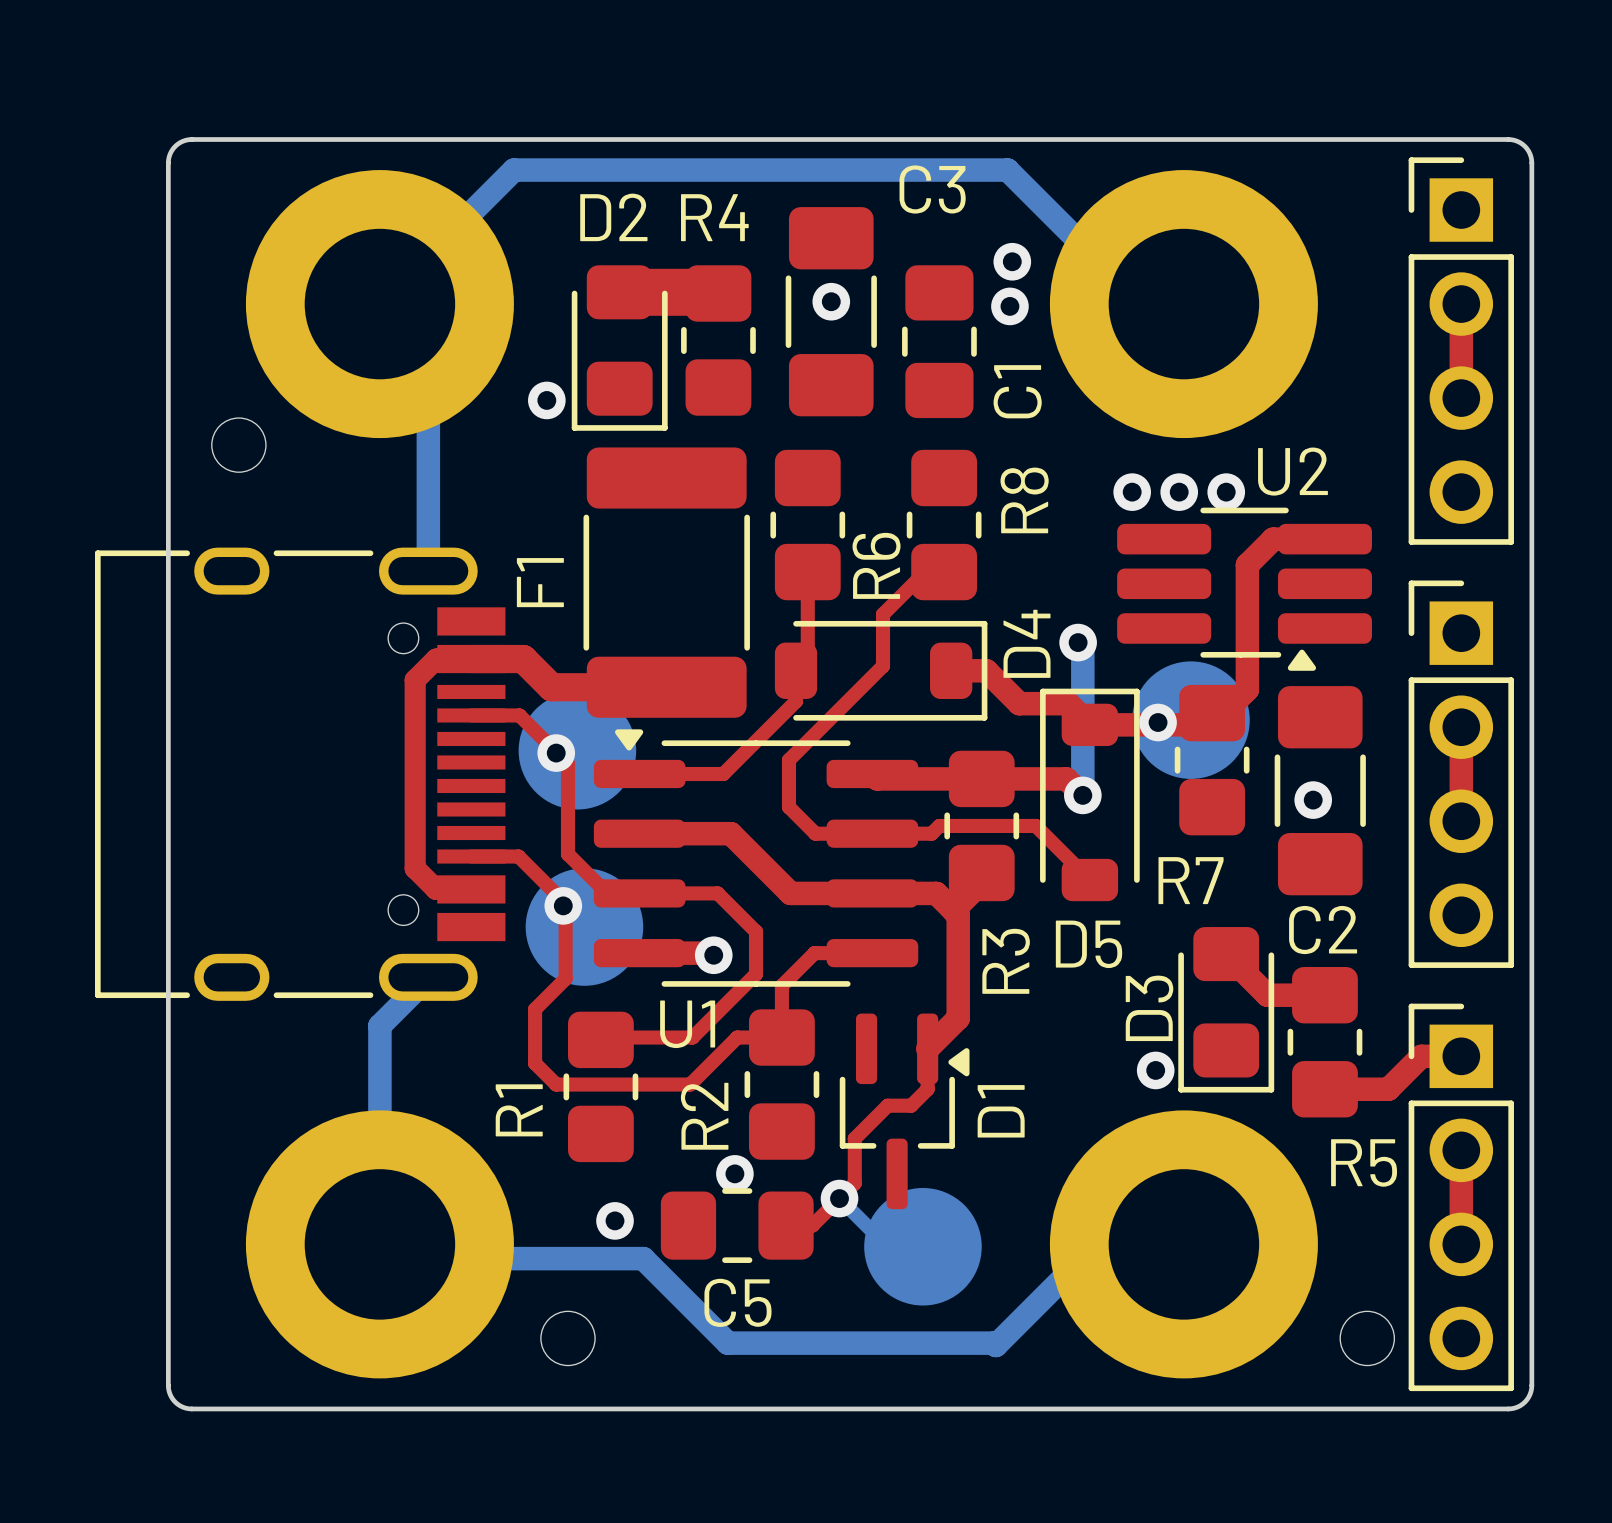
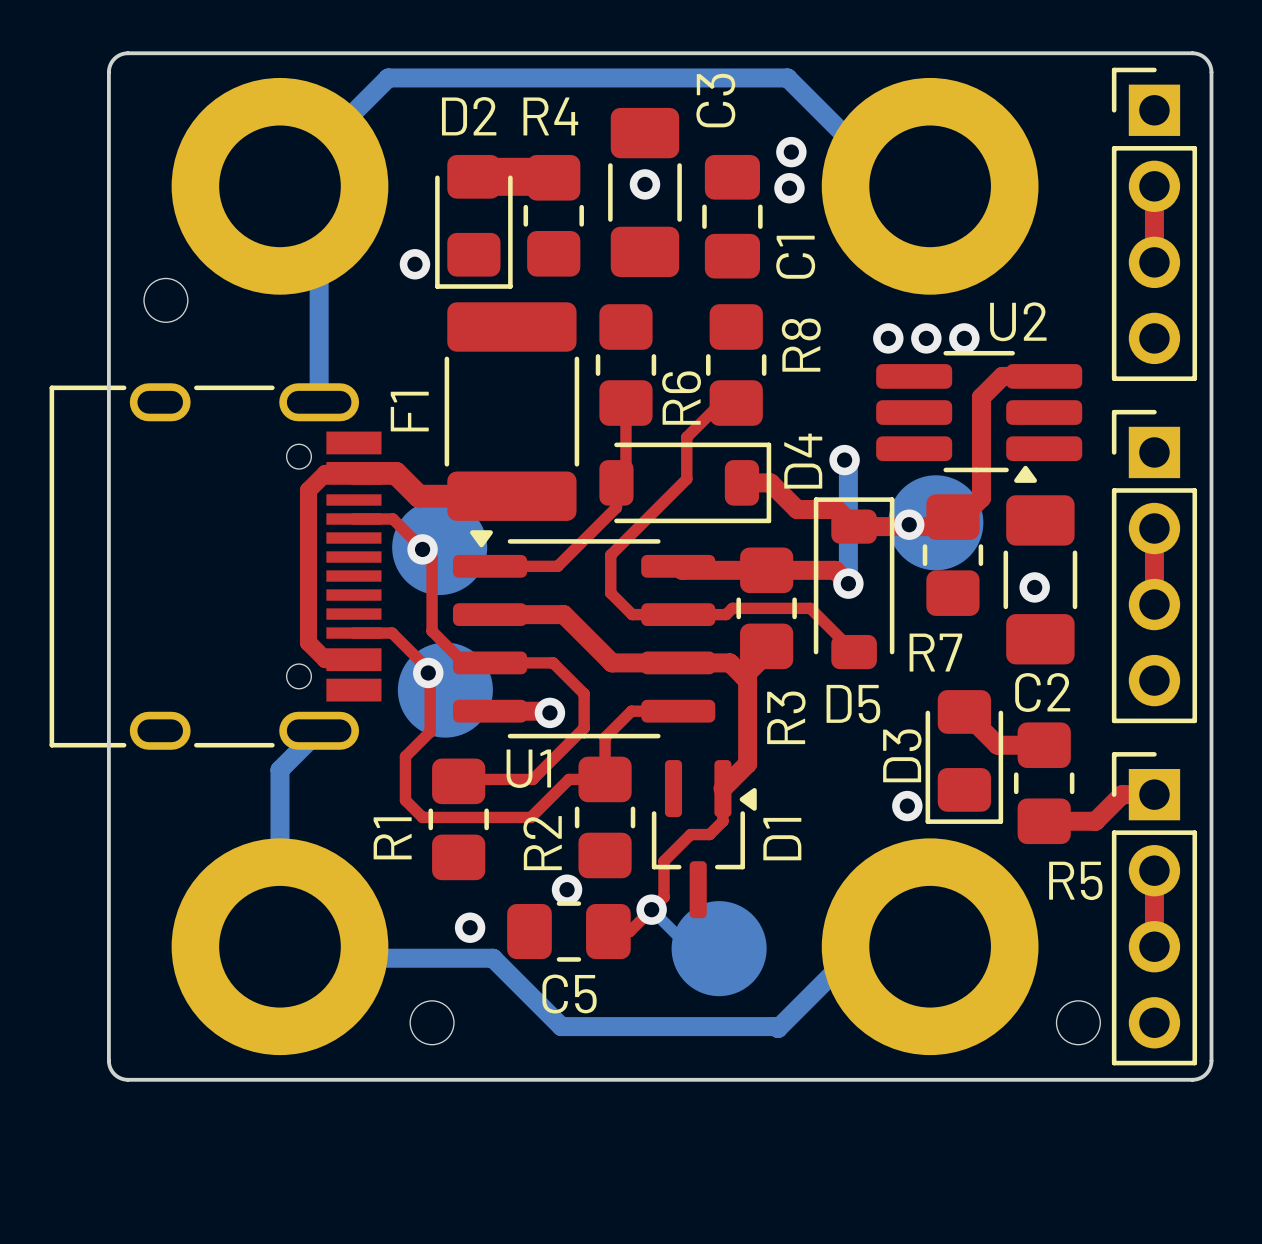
C3 name rotation: 0° (932, 189) -> 90° counterclockwise (715, 100)

